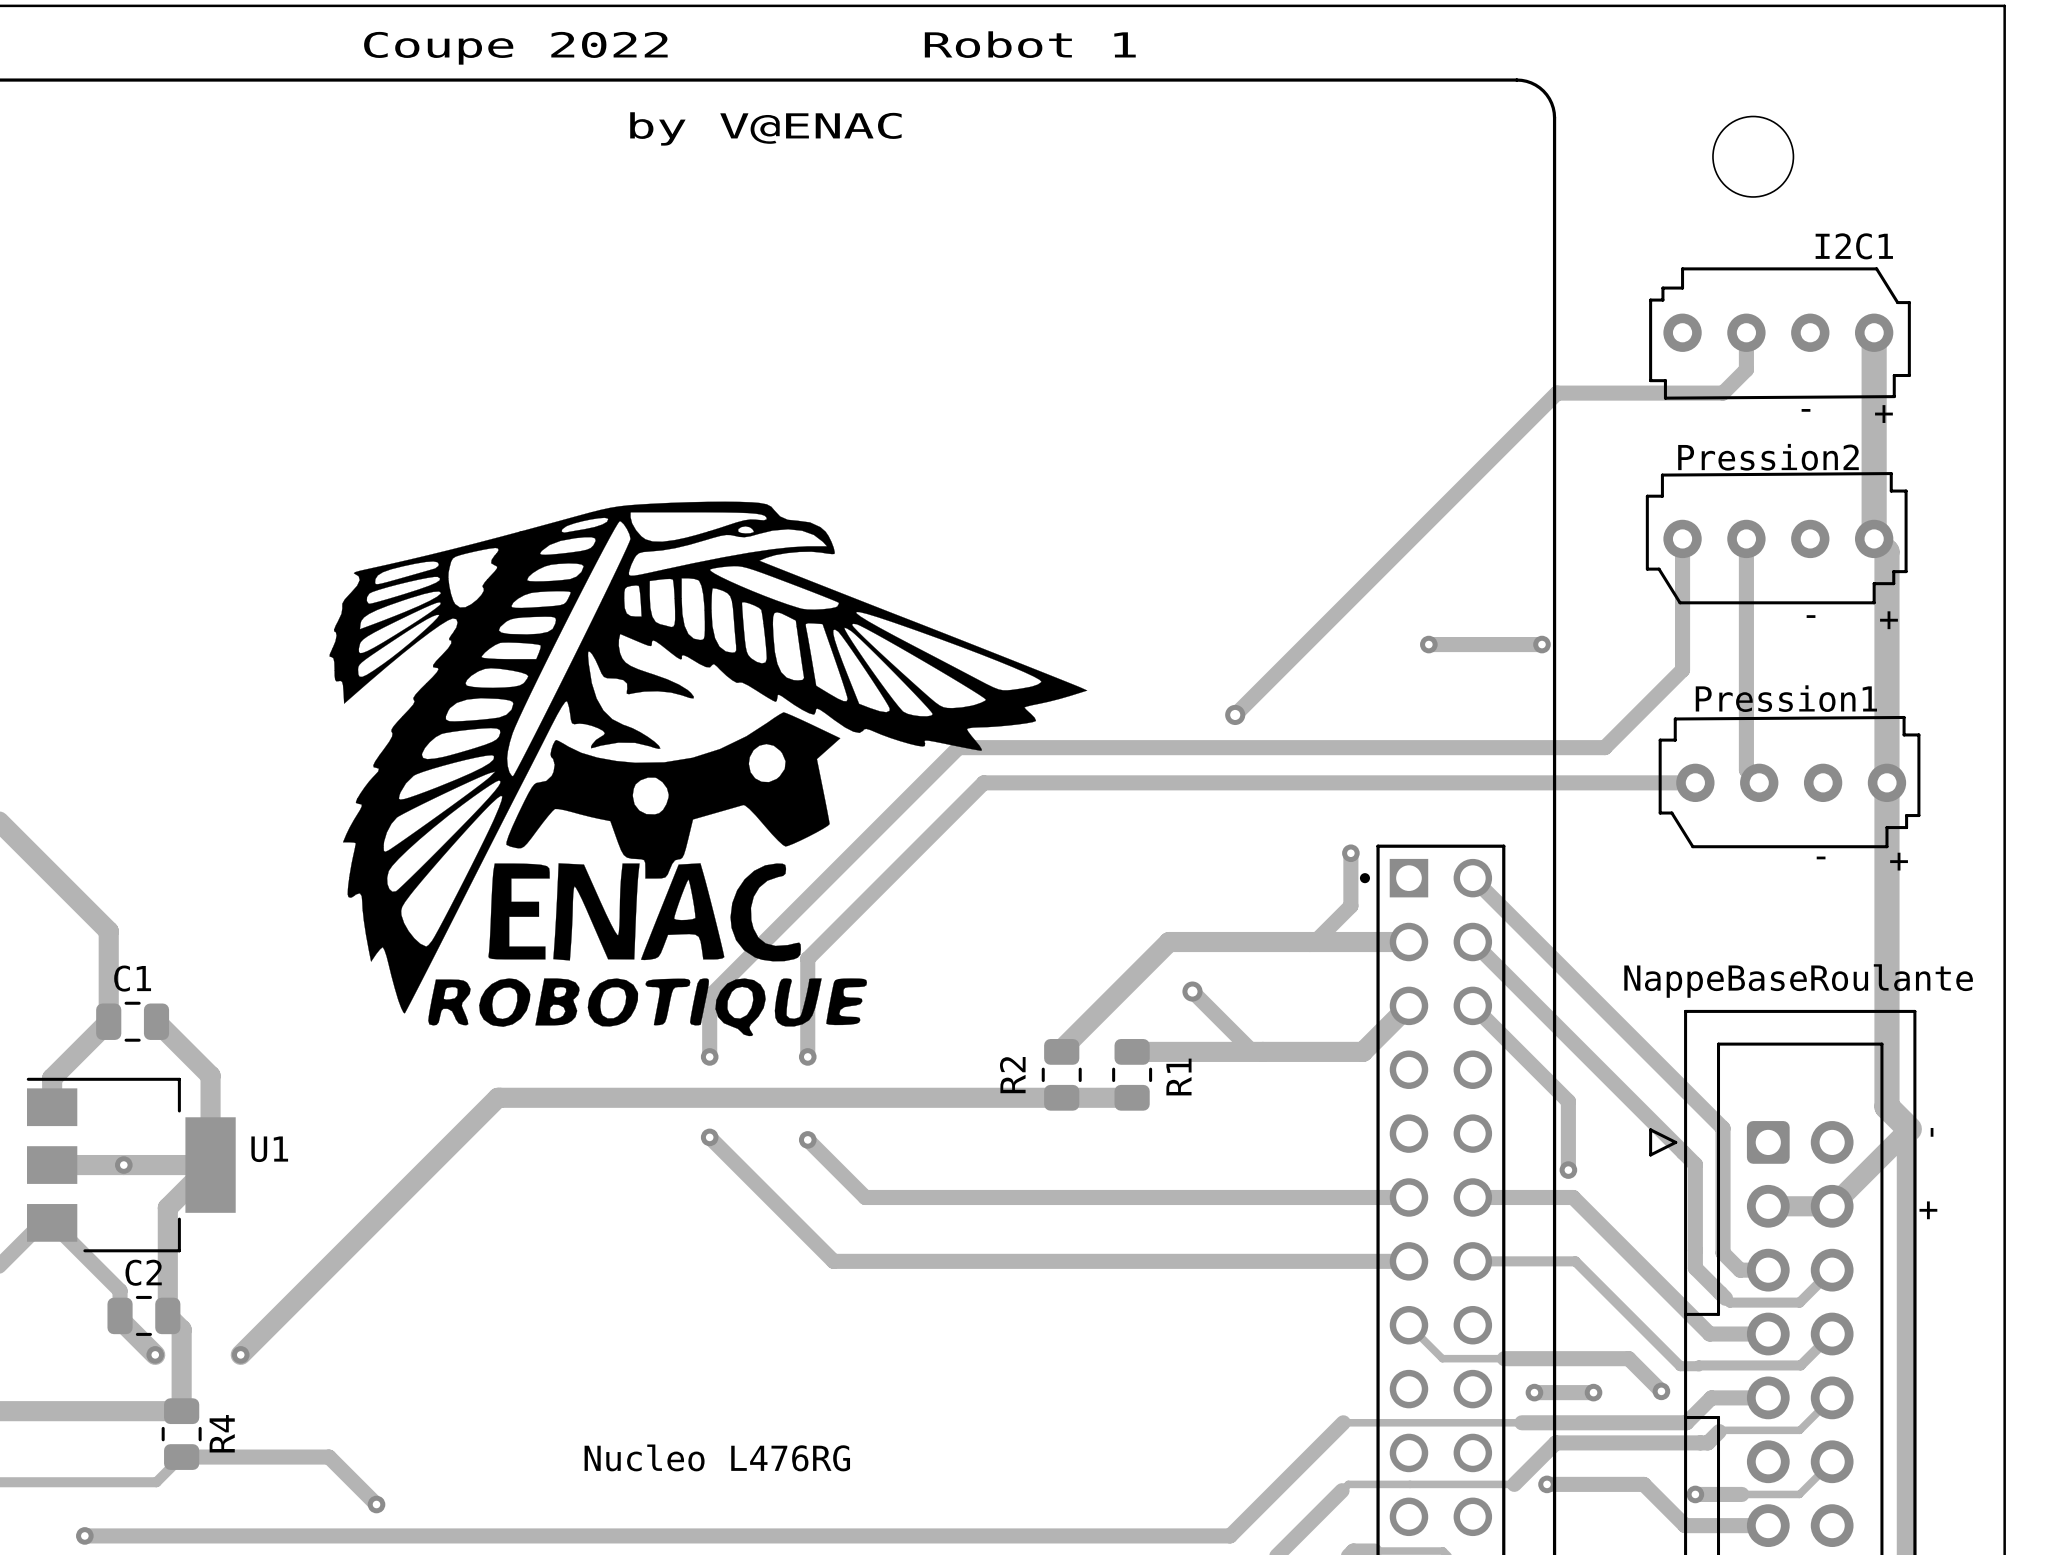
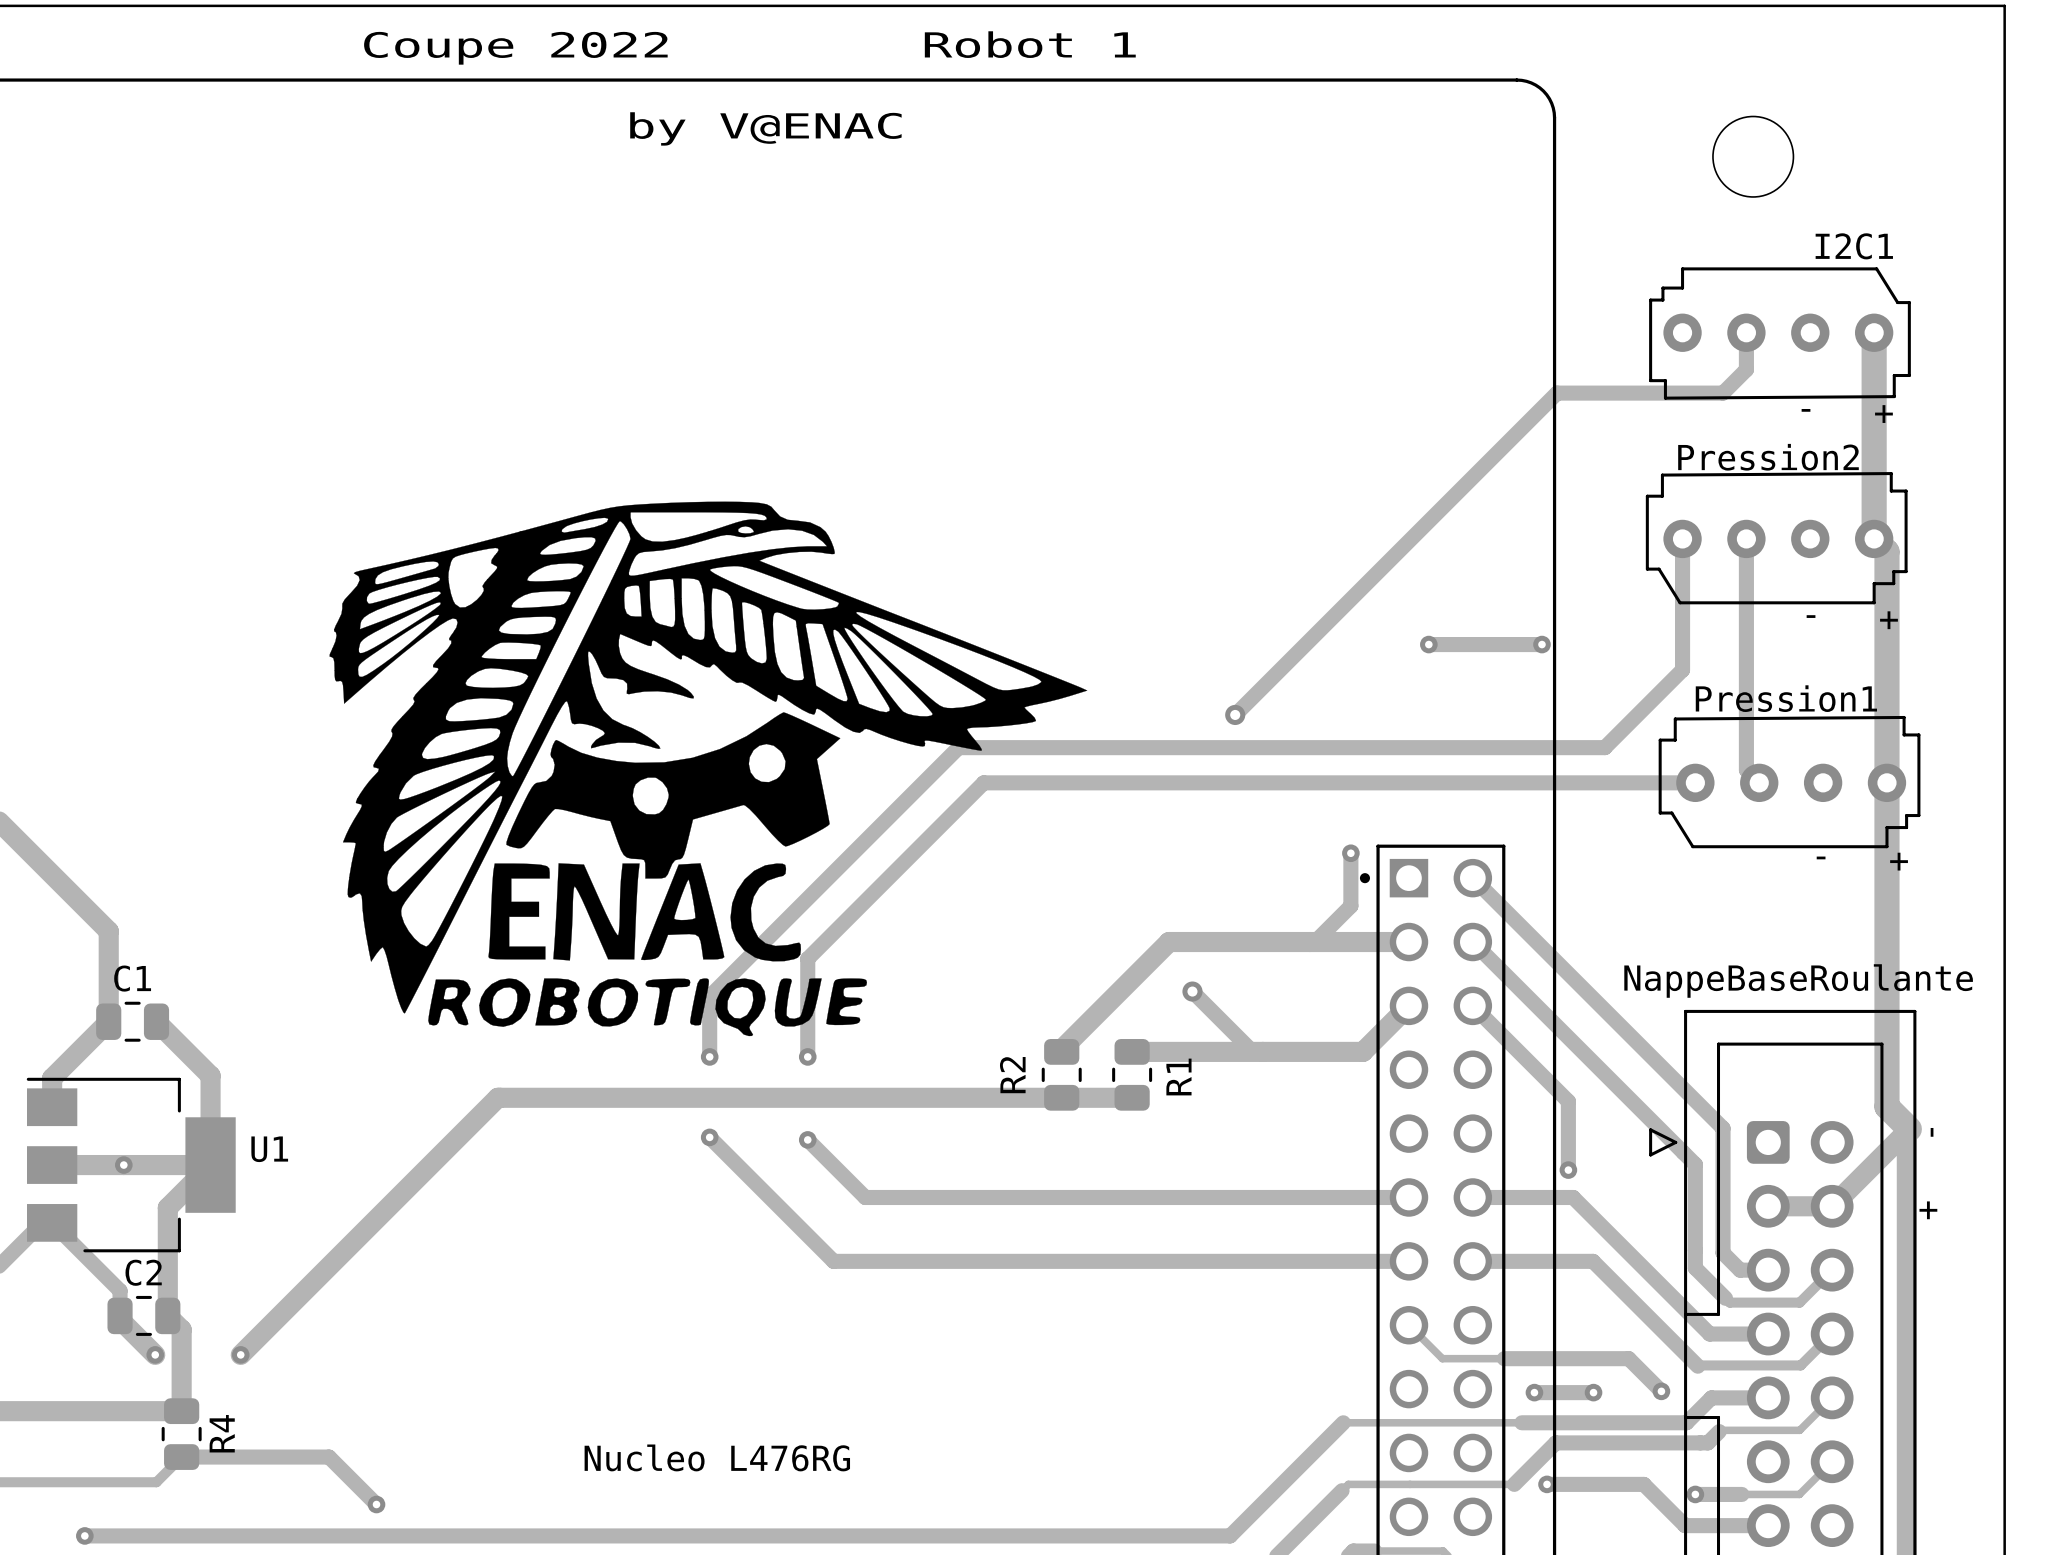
track width: thin (1472, 1261) (1575, 1261) -> thick (1472, 1261) (1575, 1261)
track: (1575, 1261) (1680, 1366) (1697, 1366) -> (1575, 1261) (1593, 1261) (1697, 1366) (1800, 1365)

